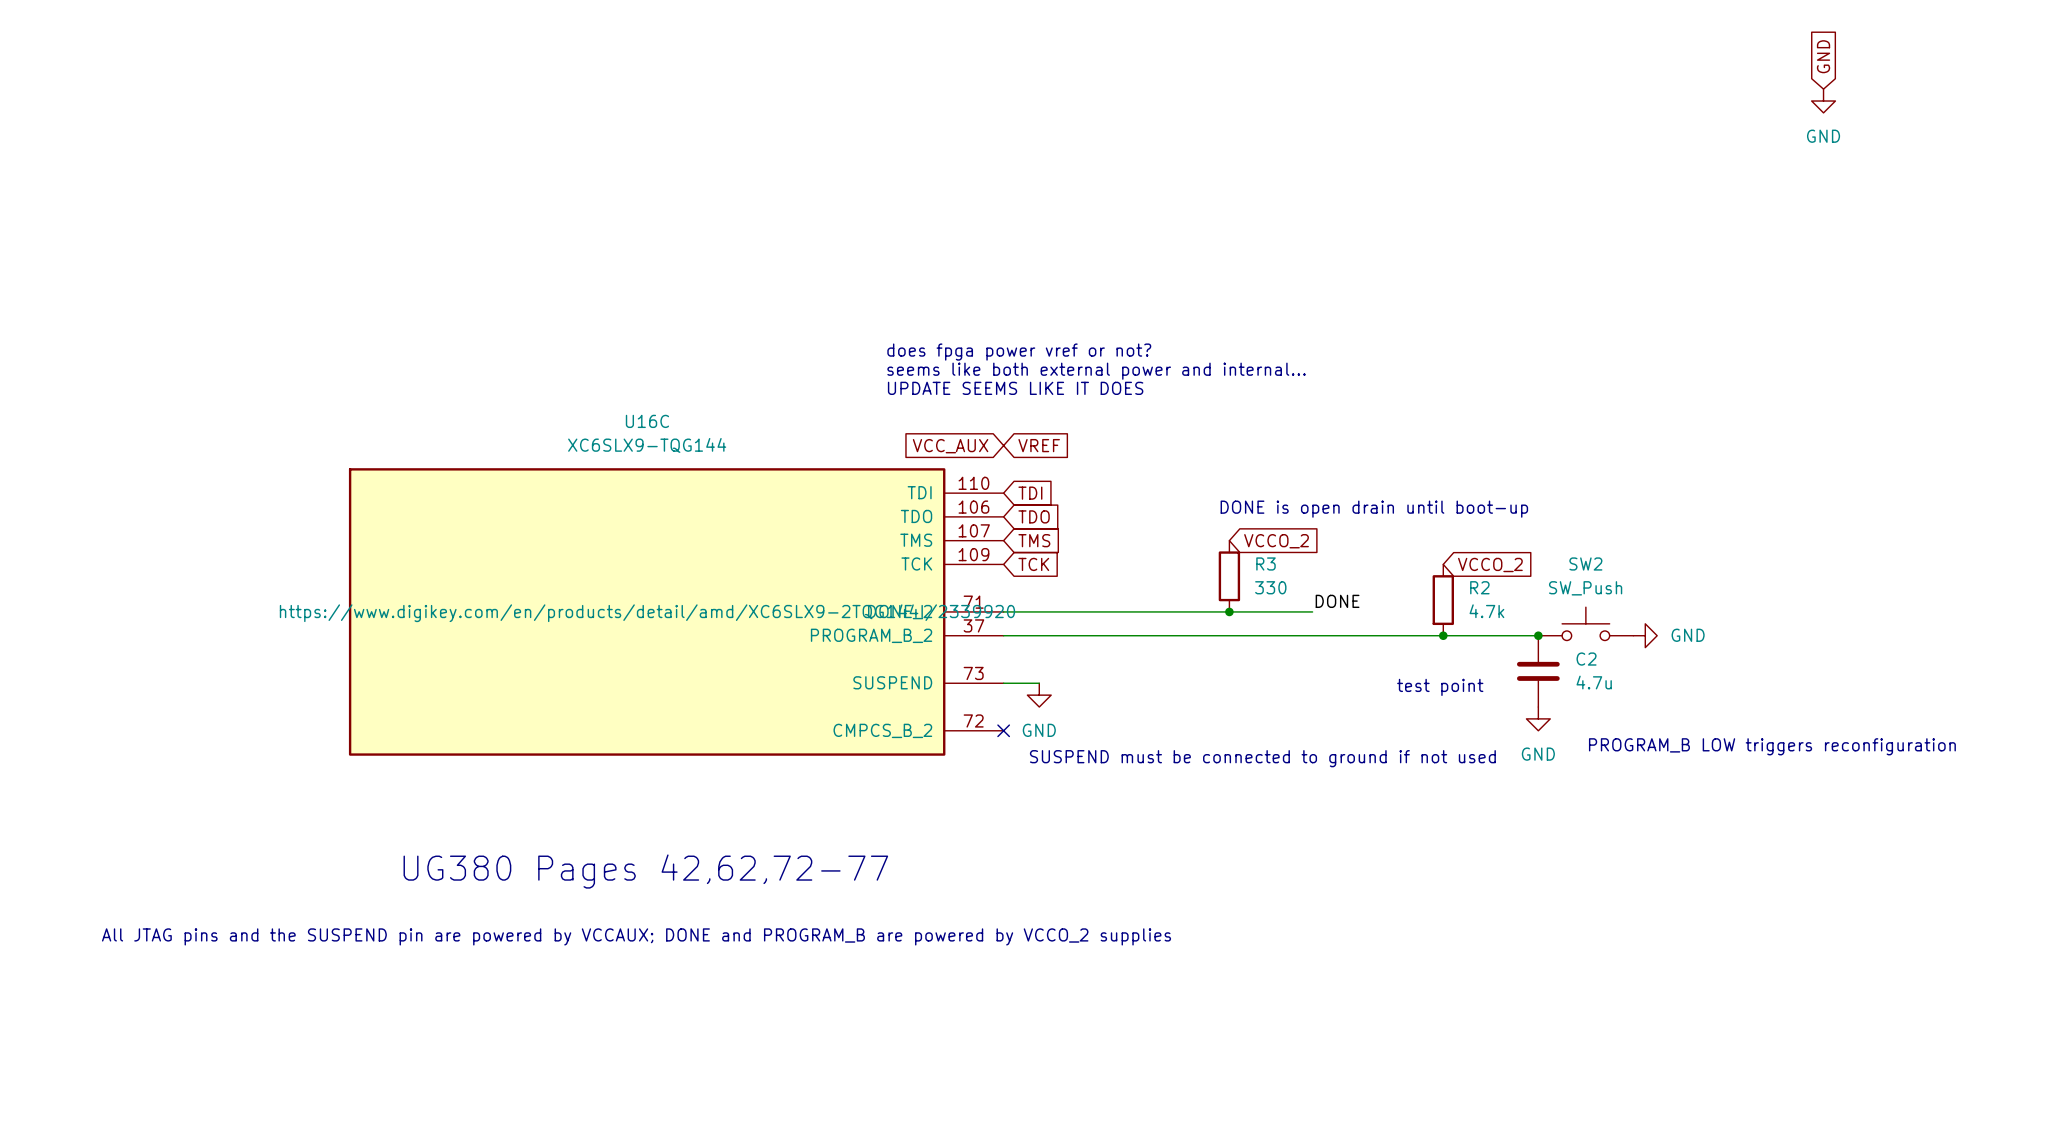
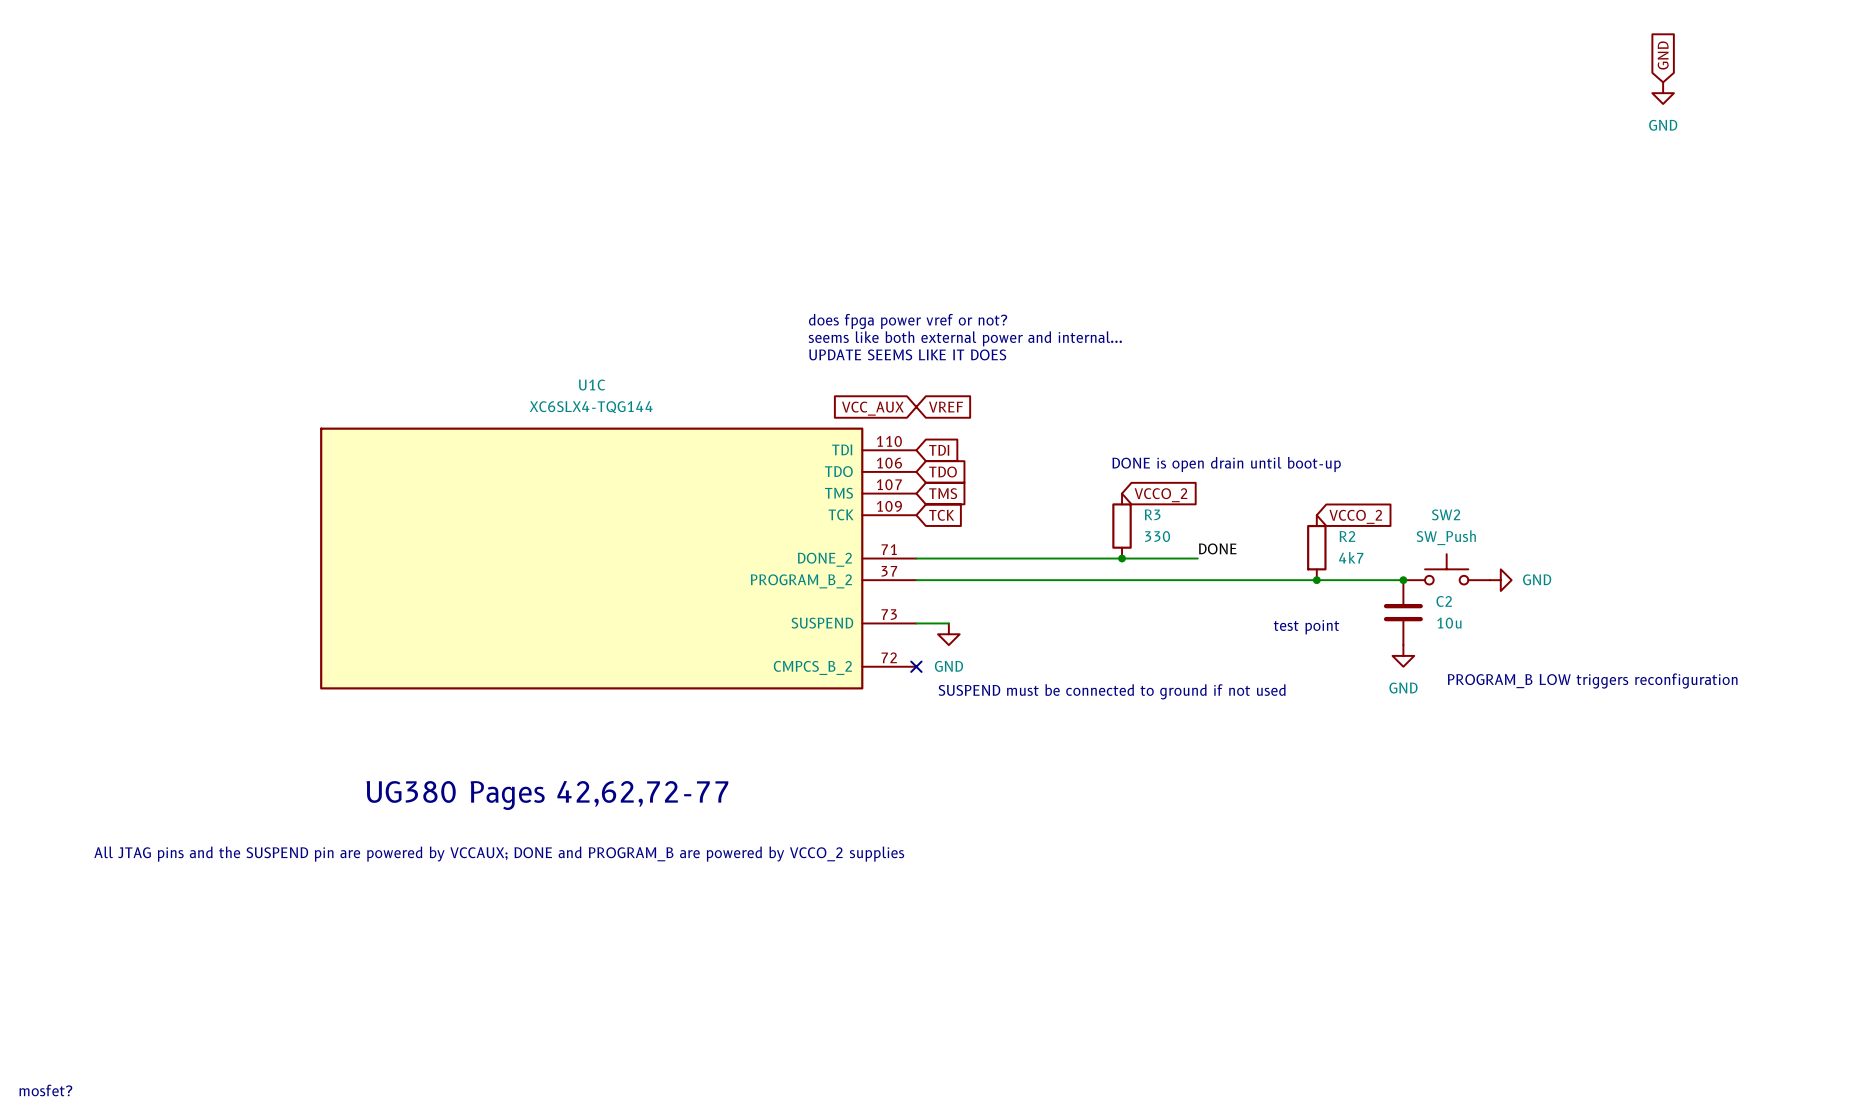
U16C name: U16C (647, 421) -> U1C (591, 385)
U16C value: XC6SLX9-TQG144 (647, 445) -> XC6SLX4-TQG144 (591, 407)
R2 value: 4.7k (1486, 611) -> 4k7 (1351, 557)
U16C text: https://www.digikey.com/en/products/detail/amd/XC6SLX9-2TQG144I/2339920 (647, 613) -> none
C2 value: 4.7u (1594, 682) -> 10u (1449, 623)

